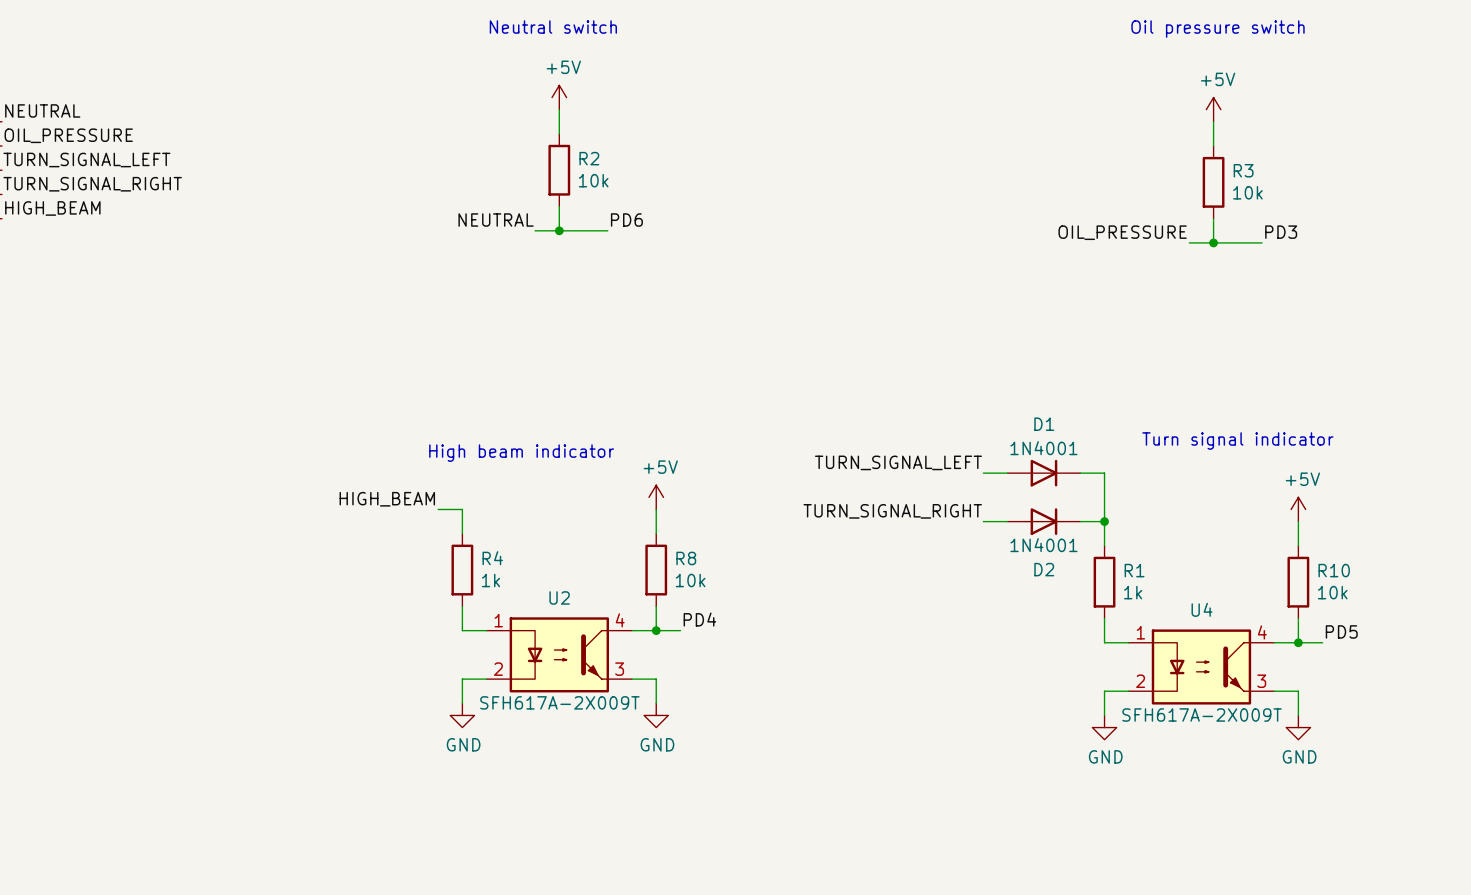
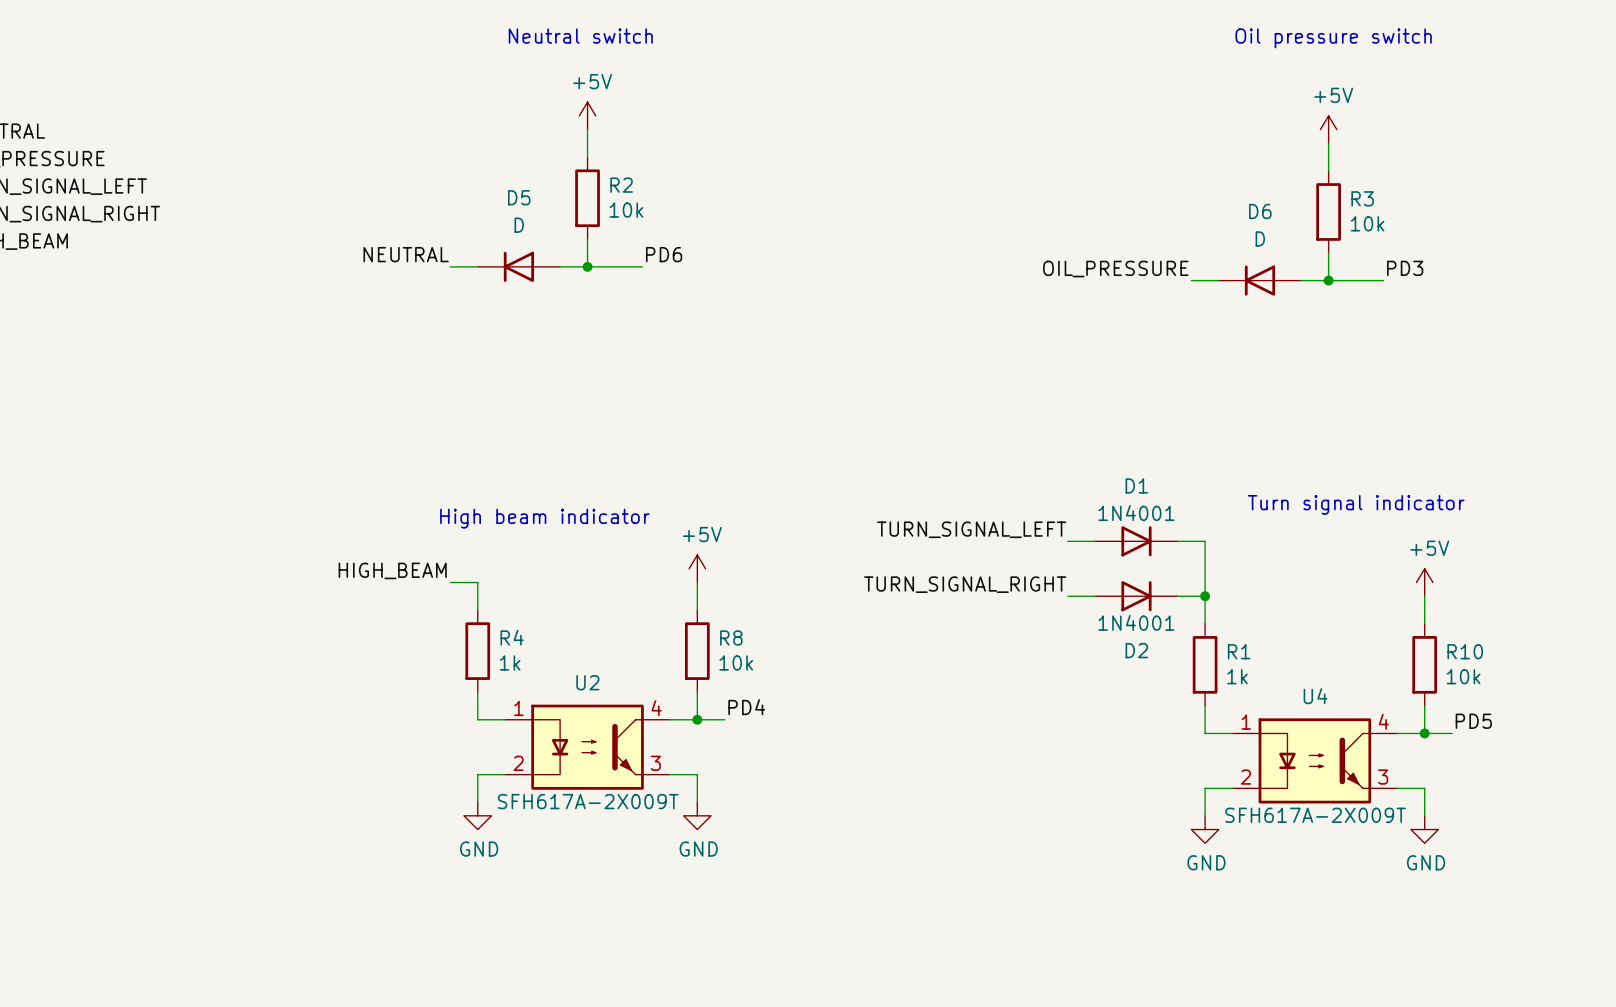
label position: NEUTRAL (496, 220) -> NEUTRAL (406, 254)
wire: none -> (450, 266) (477, 266)
D5: none -> D (518, 266)
label position: OIL_PRESSURE (1122, 232) -> OIL_PRESSURE (1115, 269)
wire: none -> (1191, 280) (1218, 280)
D6: none -> D (1259, 280)

